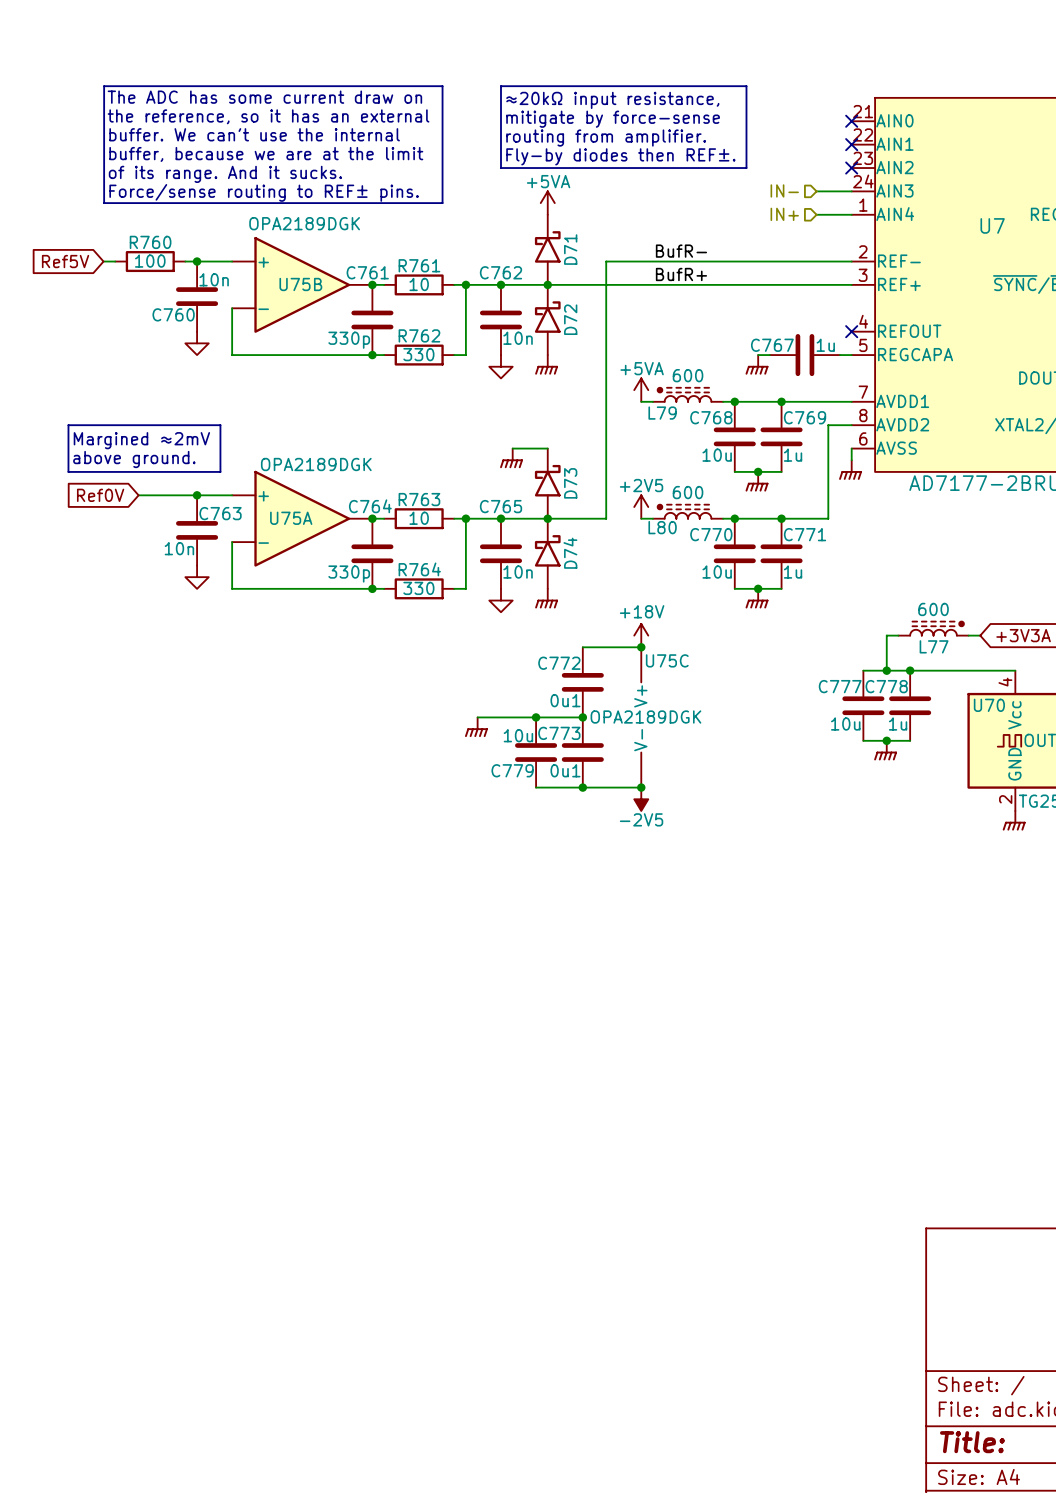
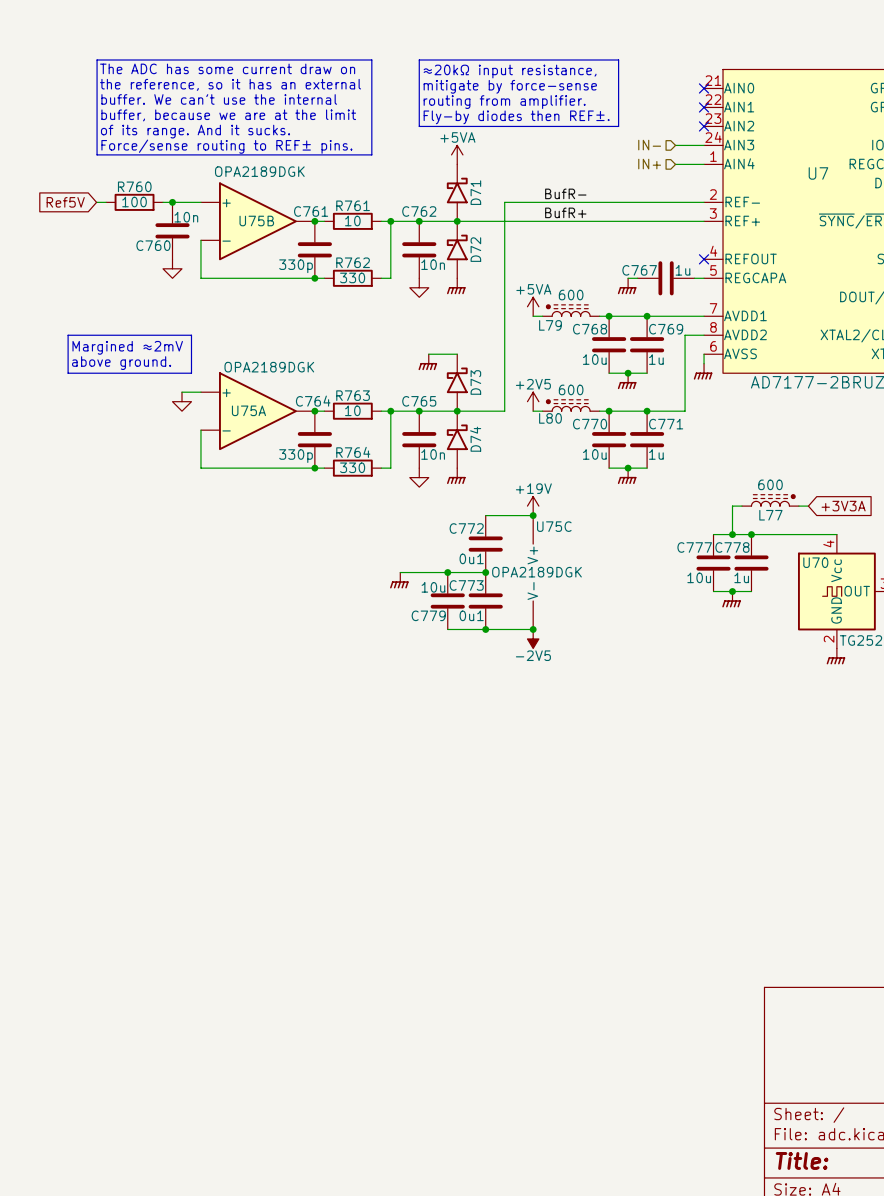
global label: Ref0V (100, 495) -> none
wire: (138, 495) (208, 495) -> none
junction: (197, 495) -> none
C763: 10n (197, 530) -> none
power symbol position: (197, 577) -> (181, 401)
power symbol: +18V (641, 635) -> +19V (533, 506)

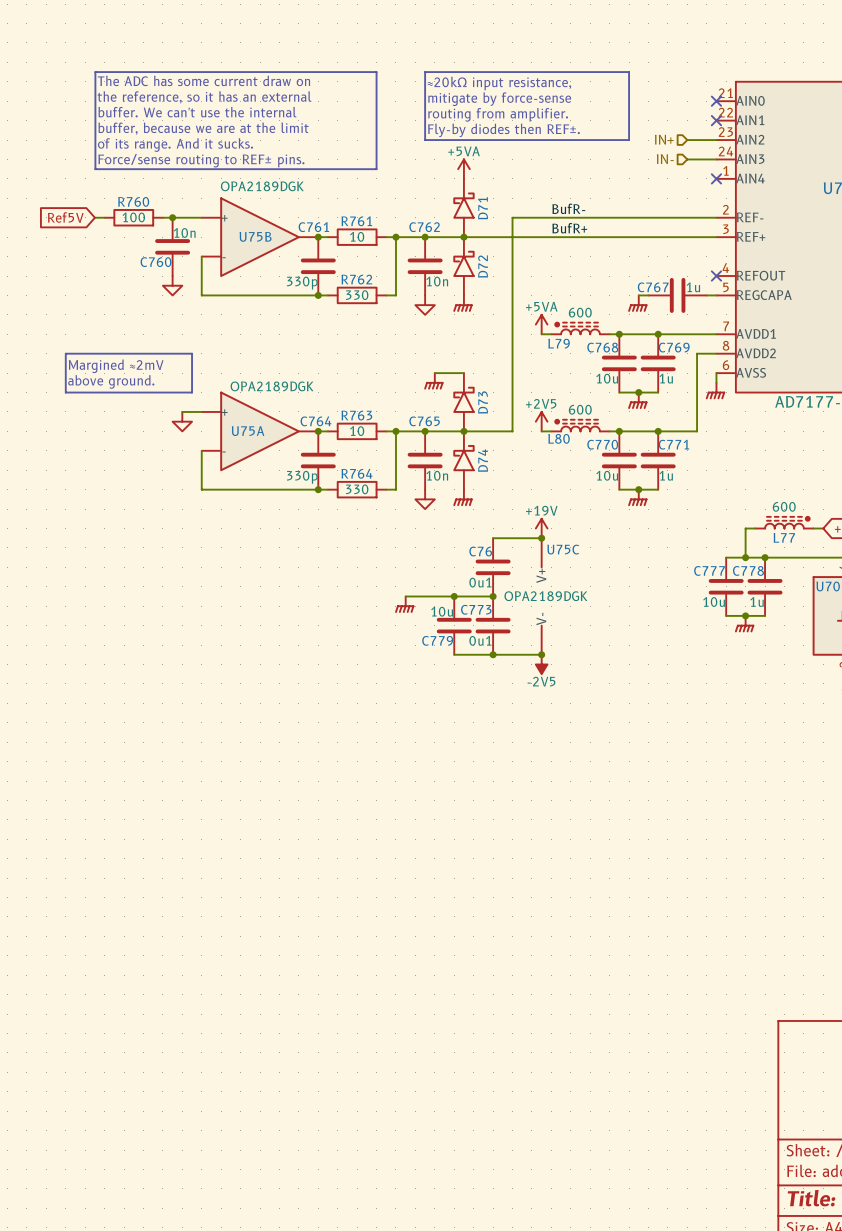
no-connect mark position: (704, 126) -> (716, 178)
hierarchical label position: IN+ (649, 164) -> IN+ (664, 139)
wire: (675, 164) (704, 164) -> (687, 140) (716, 140)
C772 name: C772 (466, 528) -> C76 (480, 551)

